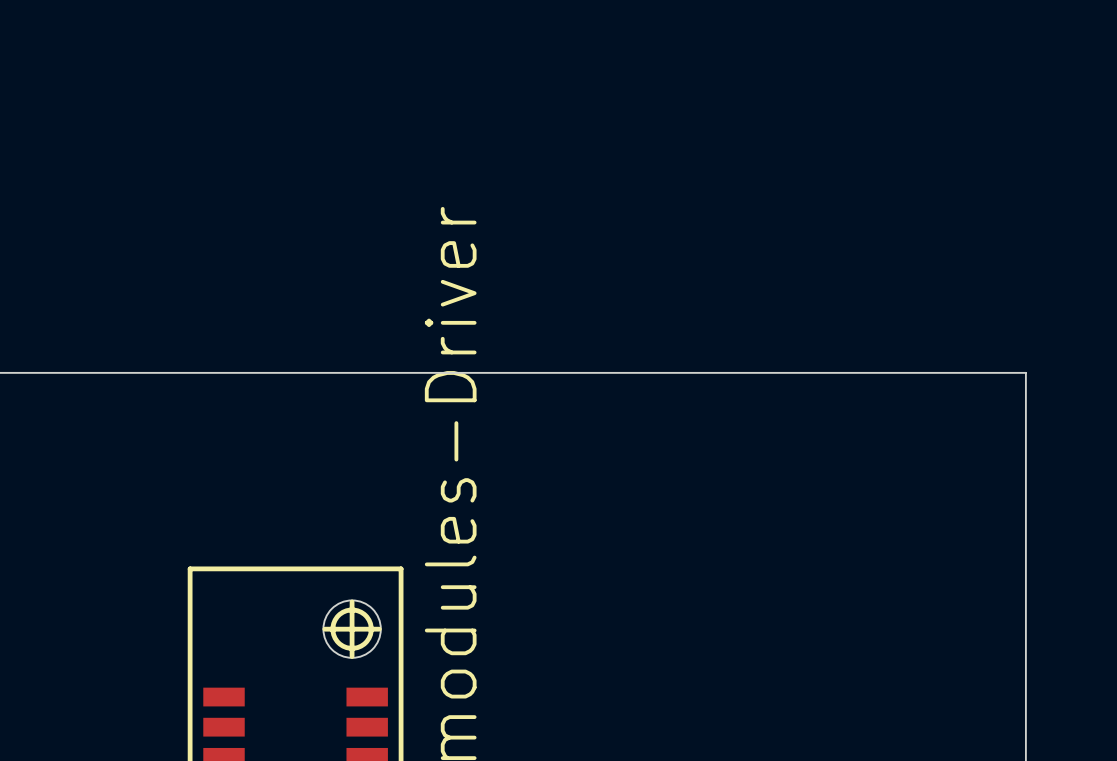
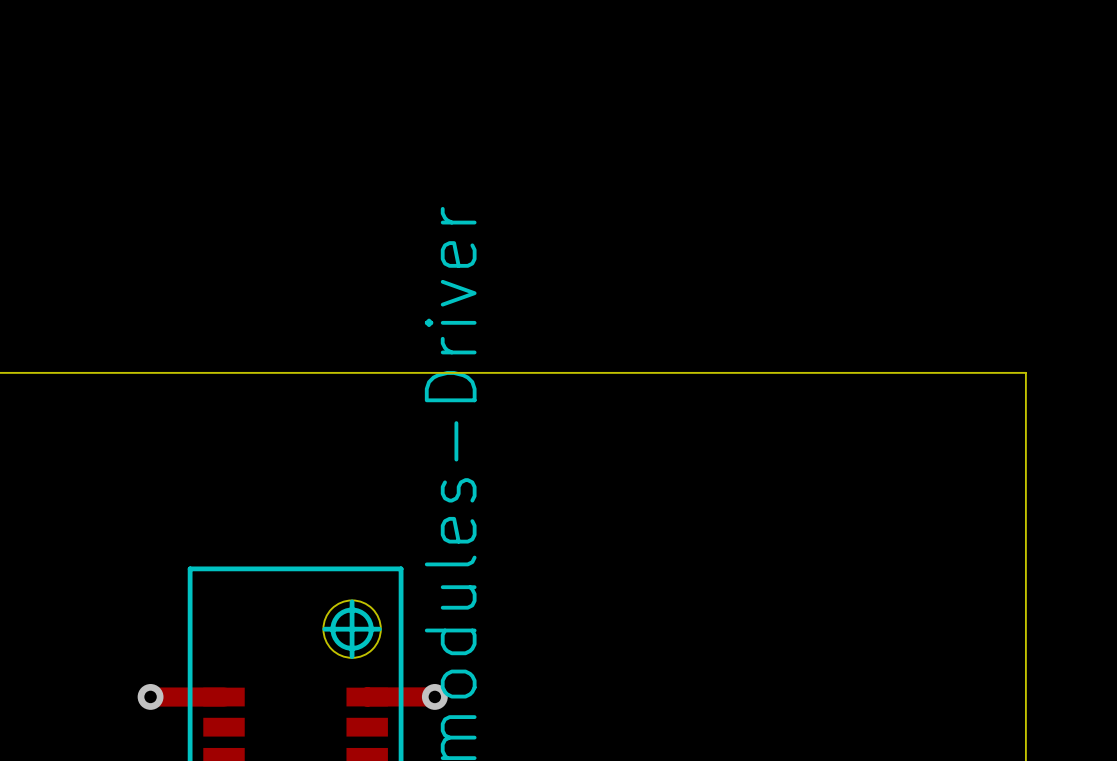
via: none -> (150, 696)
track: none -> (367, 696) (434, 696)
via: none -> (434, 696)
track: none -> (150, 697) (224, 697)

